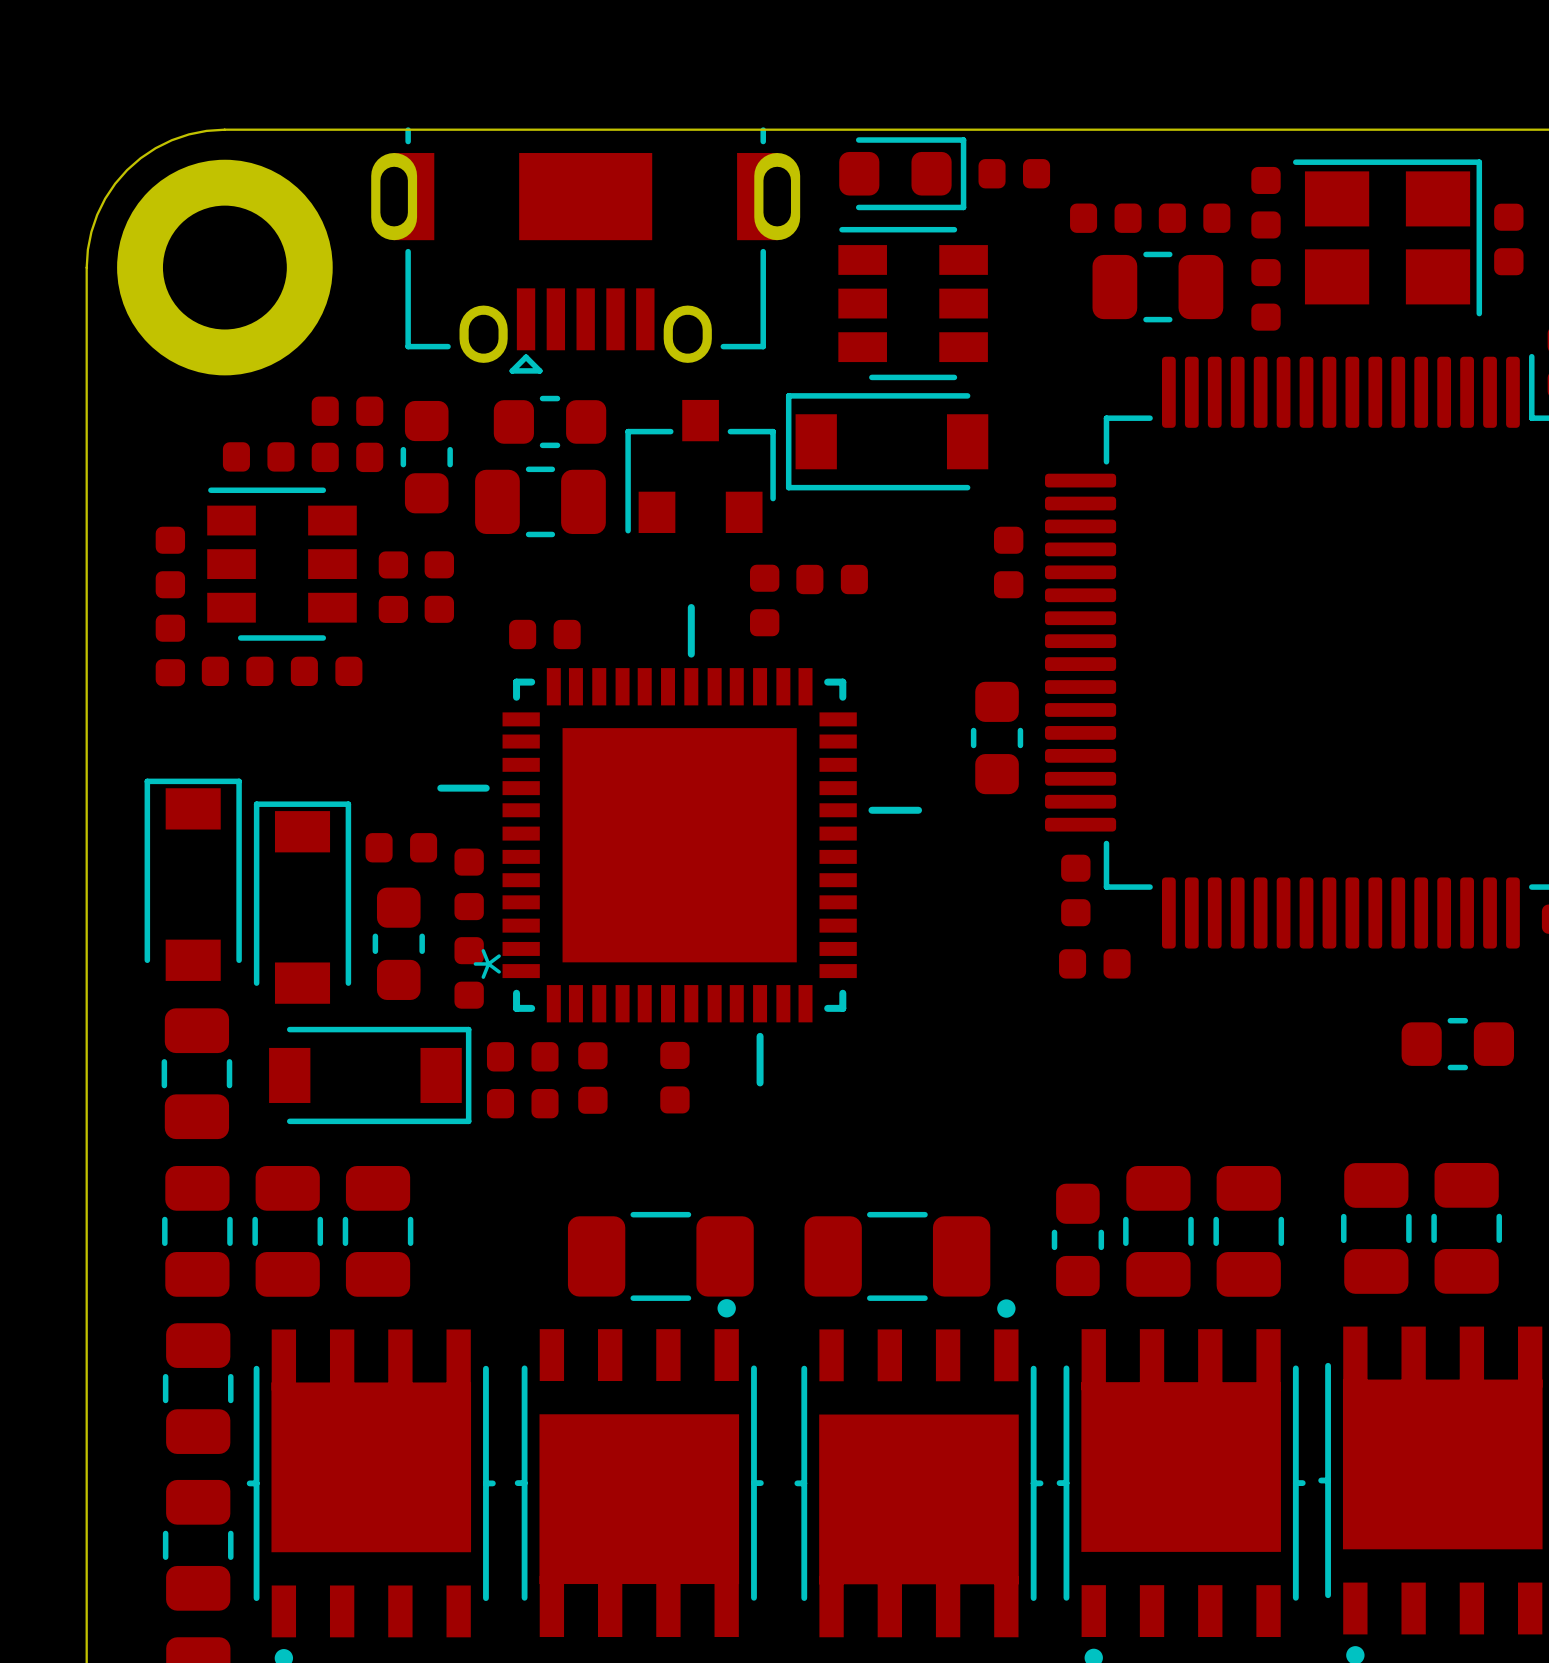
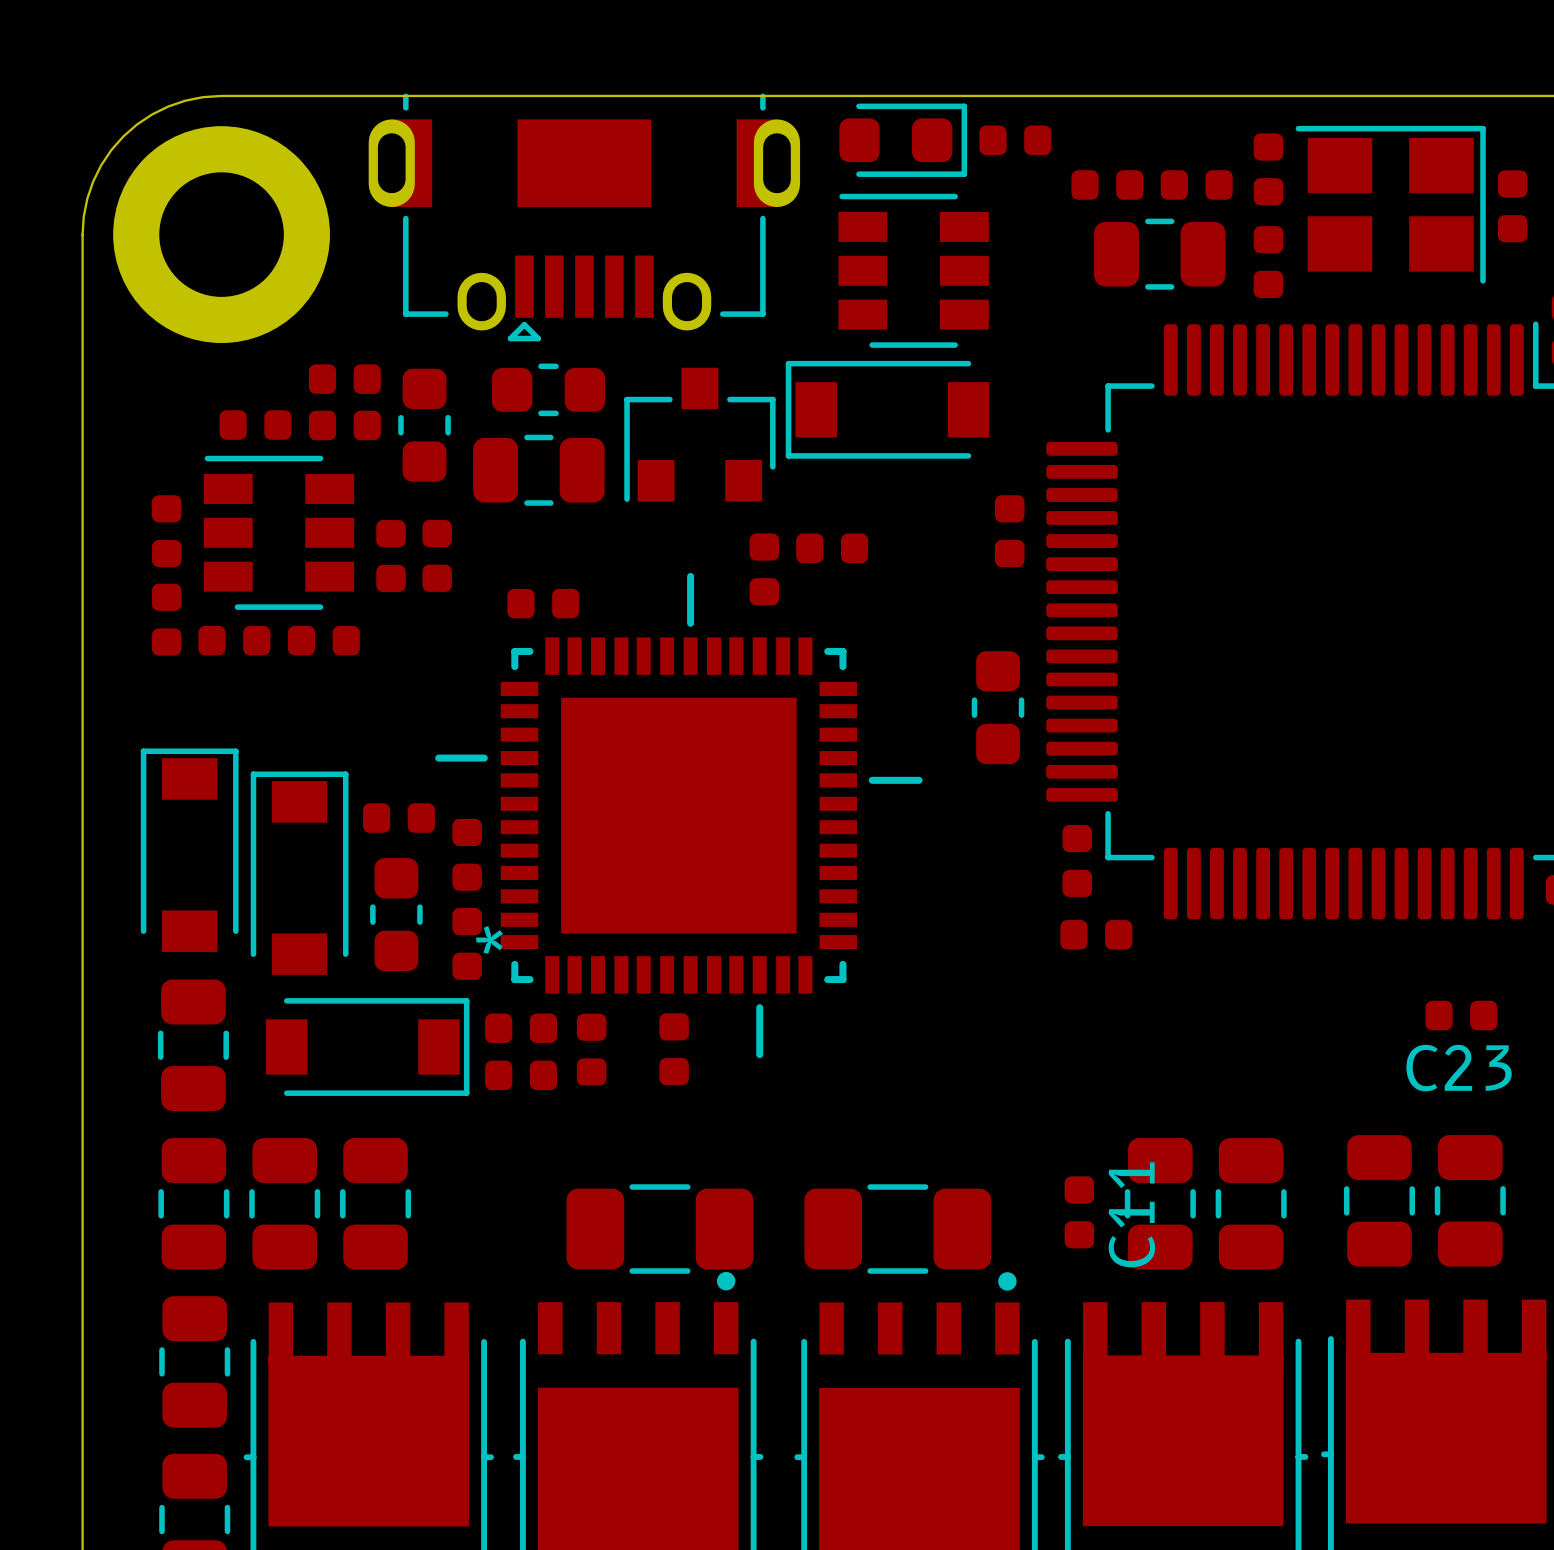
part: (1457, 1044) -> none
C23: none -> (1461, 1015)
part: (1077, 1239) -> none
C11: none -> (1079, 1212)

